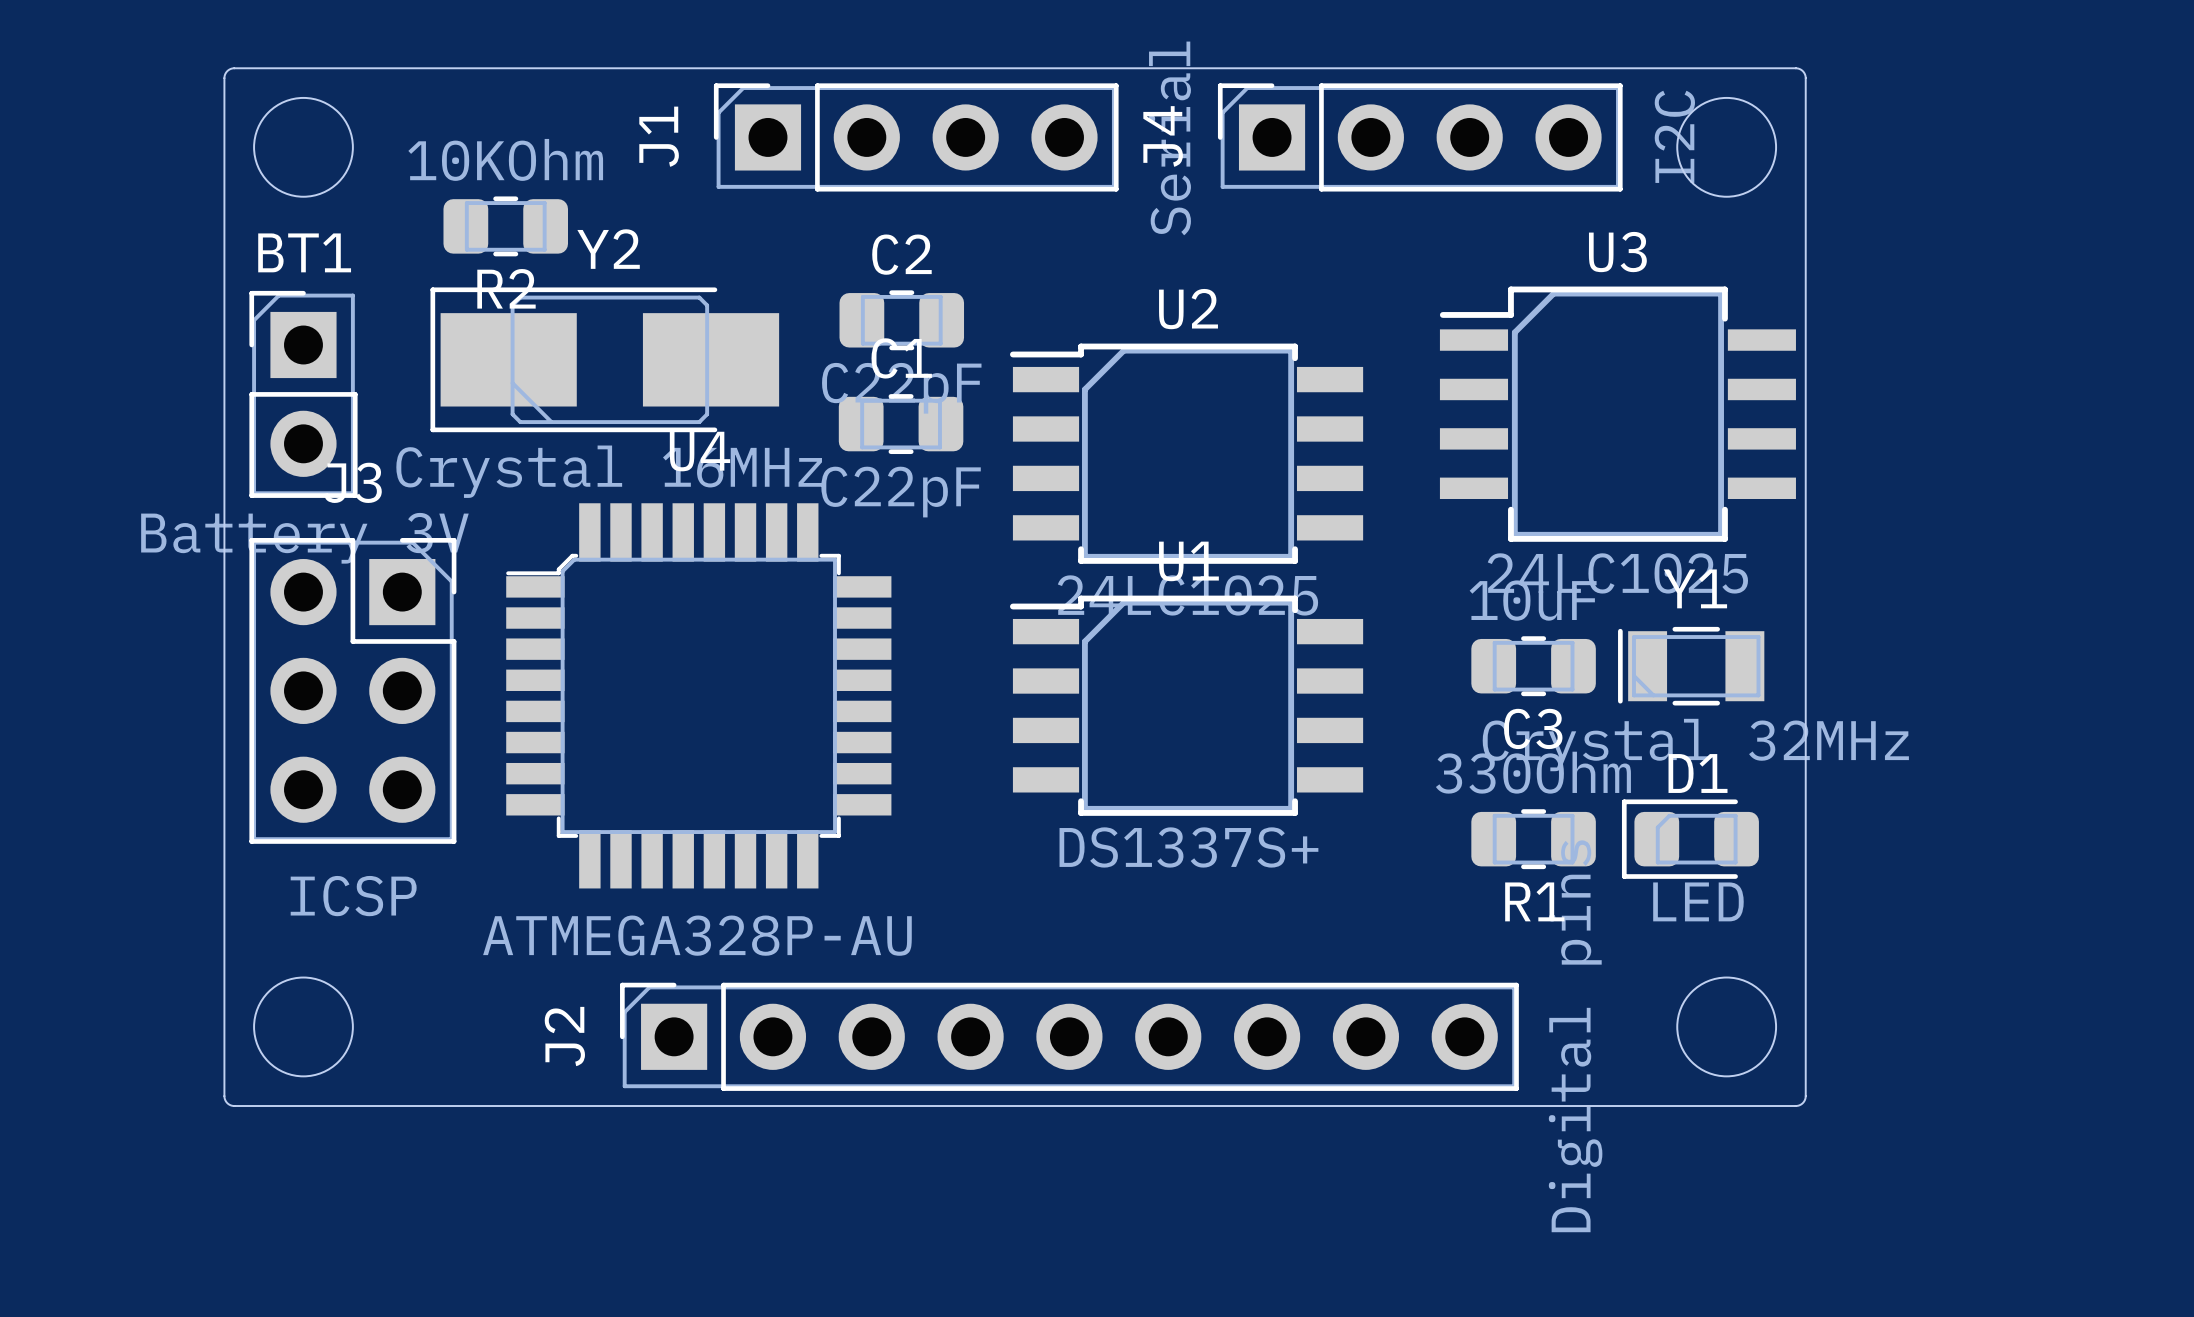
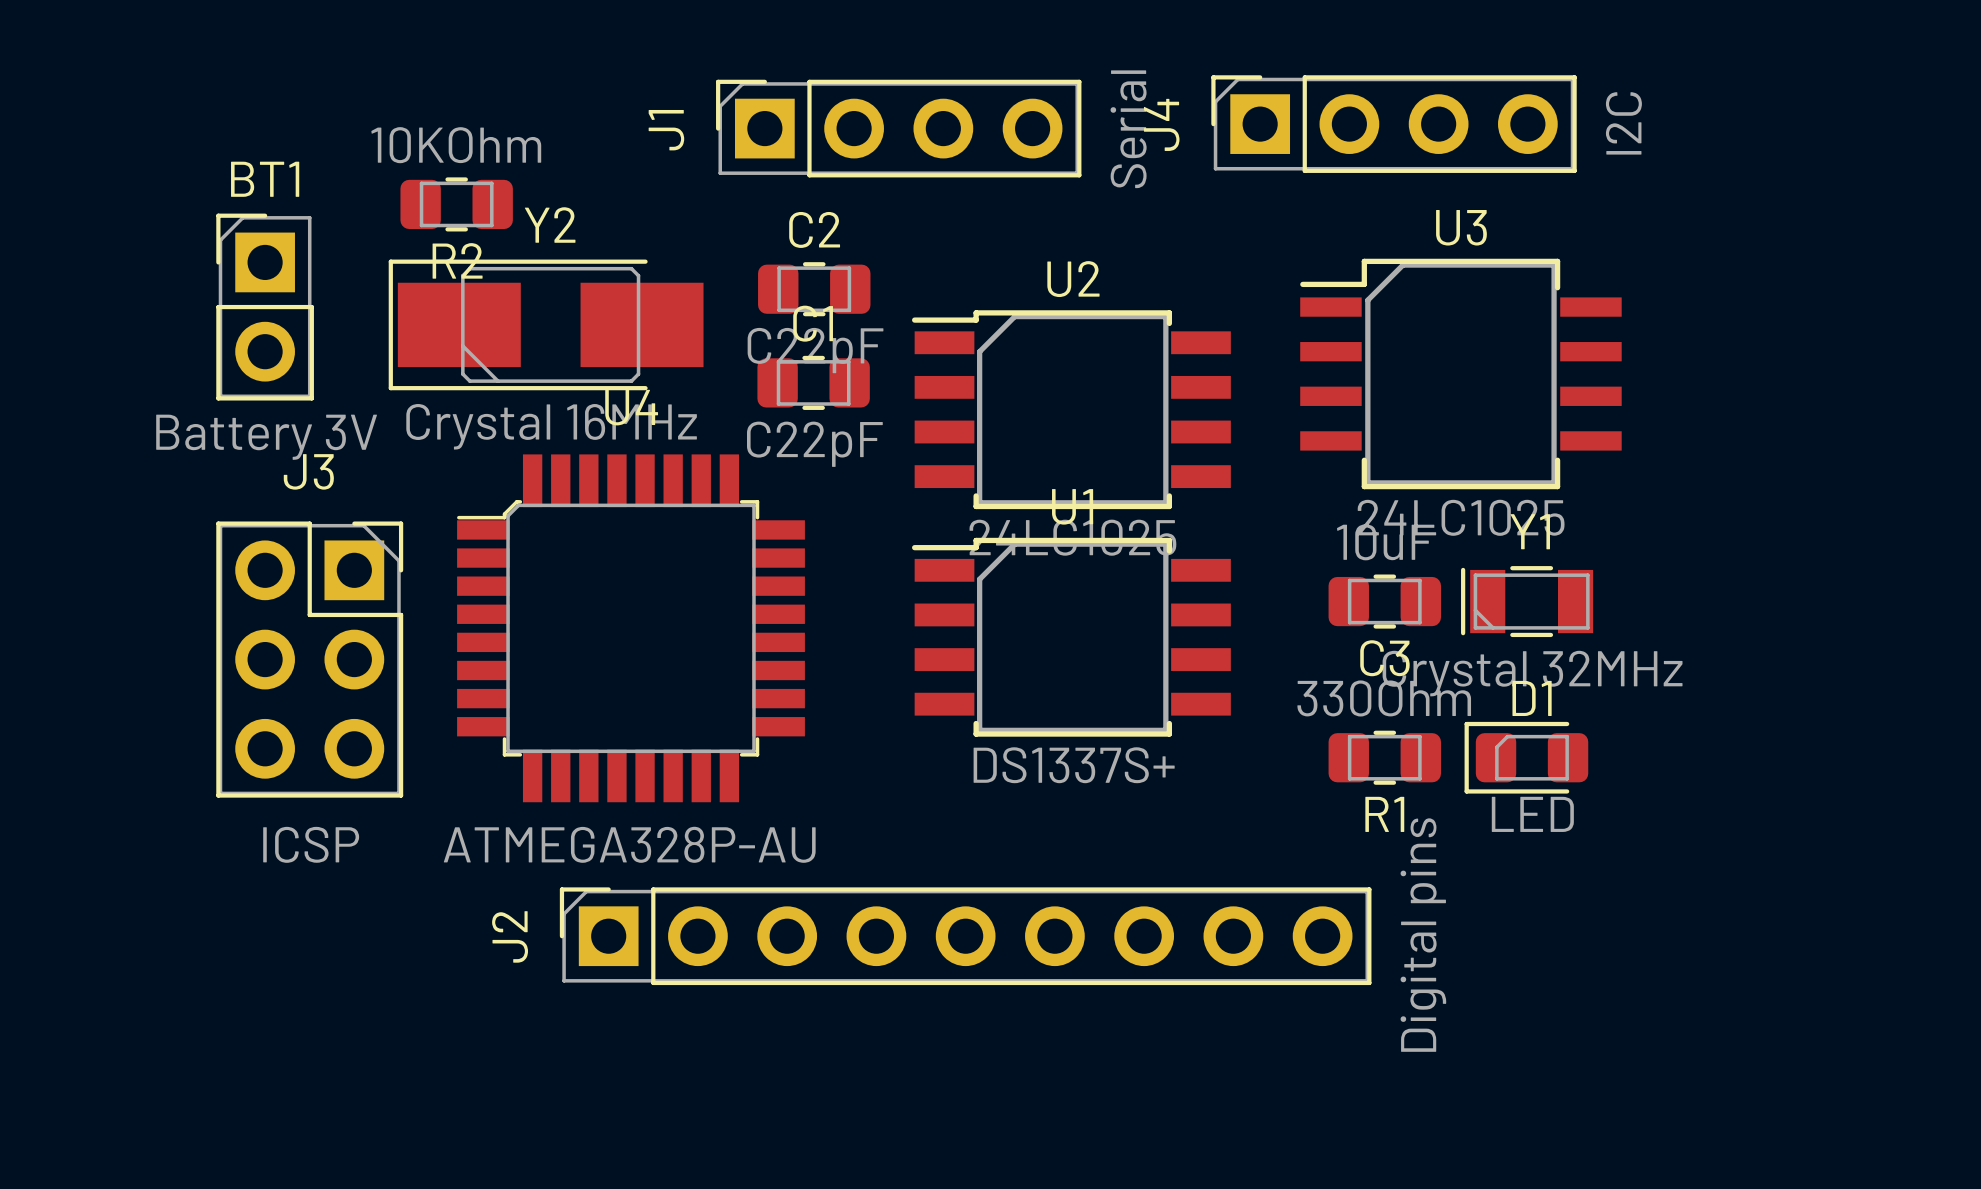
board edge: (234, 68) (1800, 69) (1805, 78) (1804, 1101) (1795, 1106) (229, 1104) (224, 1096) (224, 78) (227, 71) (234, 68) -> none
round board edge: [253, 96, 354, 198] -> none
round board edge: [1676, 96, 1778, 198] -> none
J1 position: (916, 137) -> (898, 128)
J4 position: (1420, 137) -> (1394, 124)
BT1 position: (303, 394) -> (265, 307)
J3 position: (352, 690) -> (309, 659)
round board edge: [253, 976, 354, 1078] -> none
round board edge: [1676, 976, 1778, 1078] -> none

